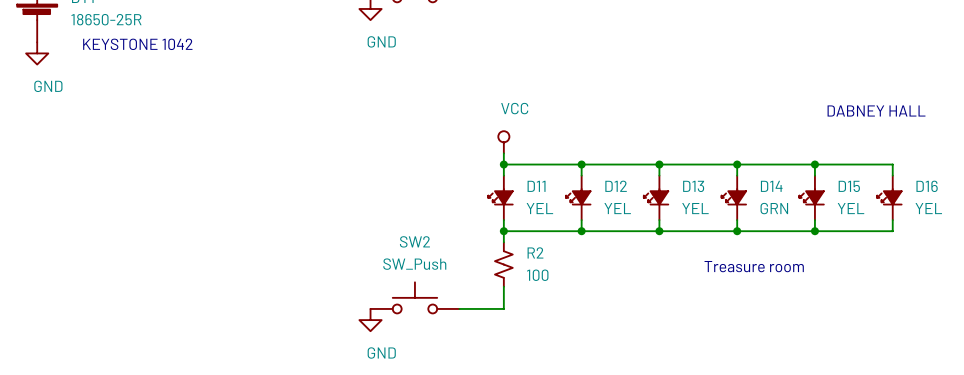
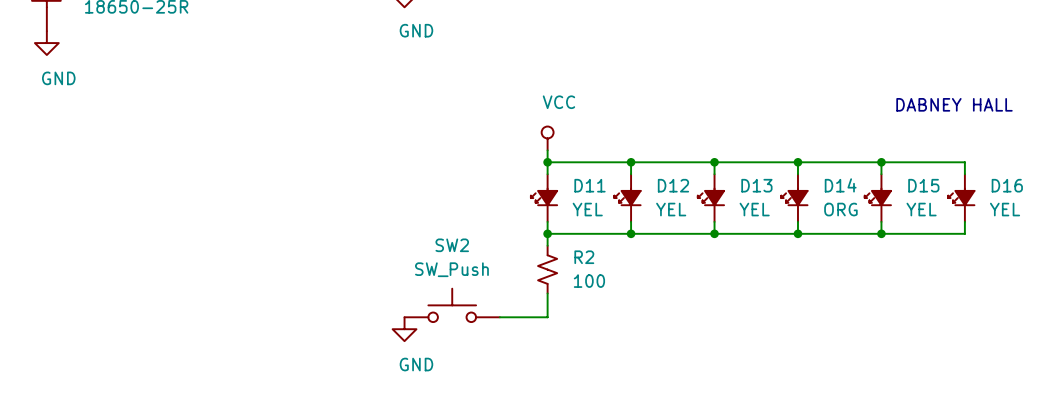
text: KEYSTONE 1042 (137, 44) -> none
D14 value: GRN (774, 208) -> ORG (840, 209)
text: Treasure room (754, 266) -> none

